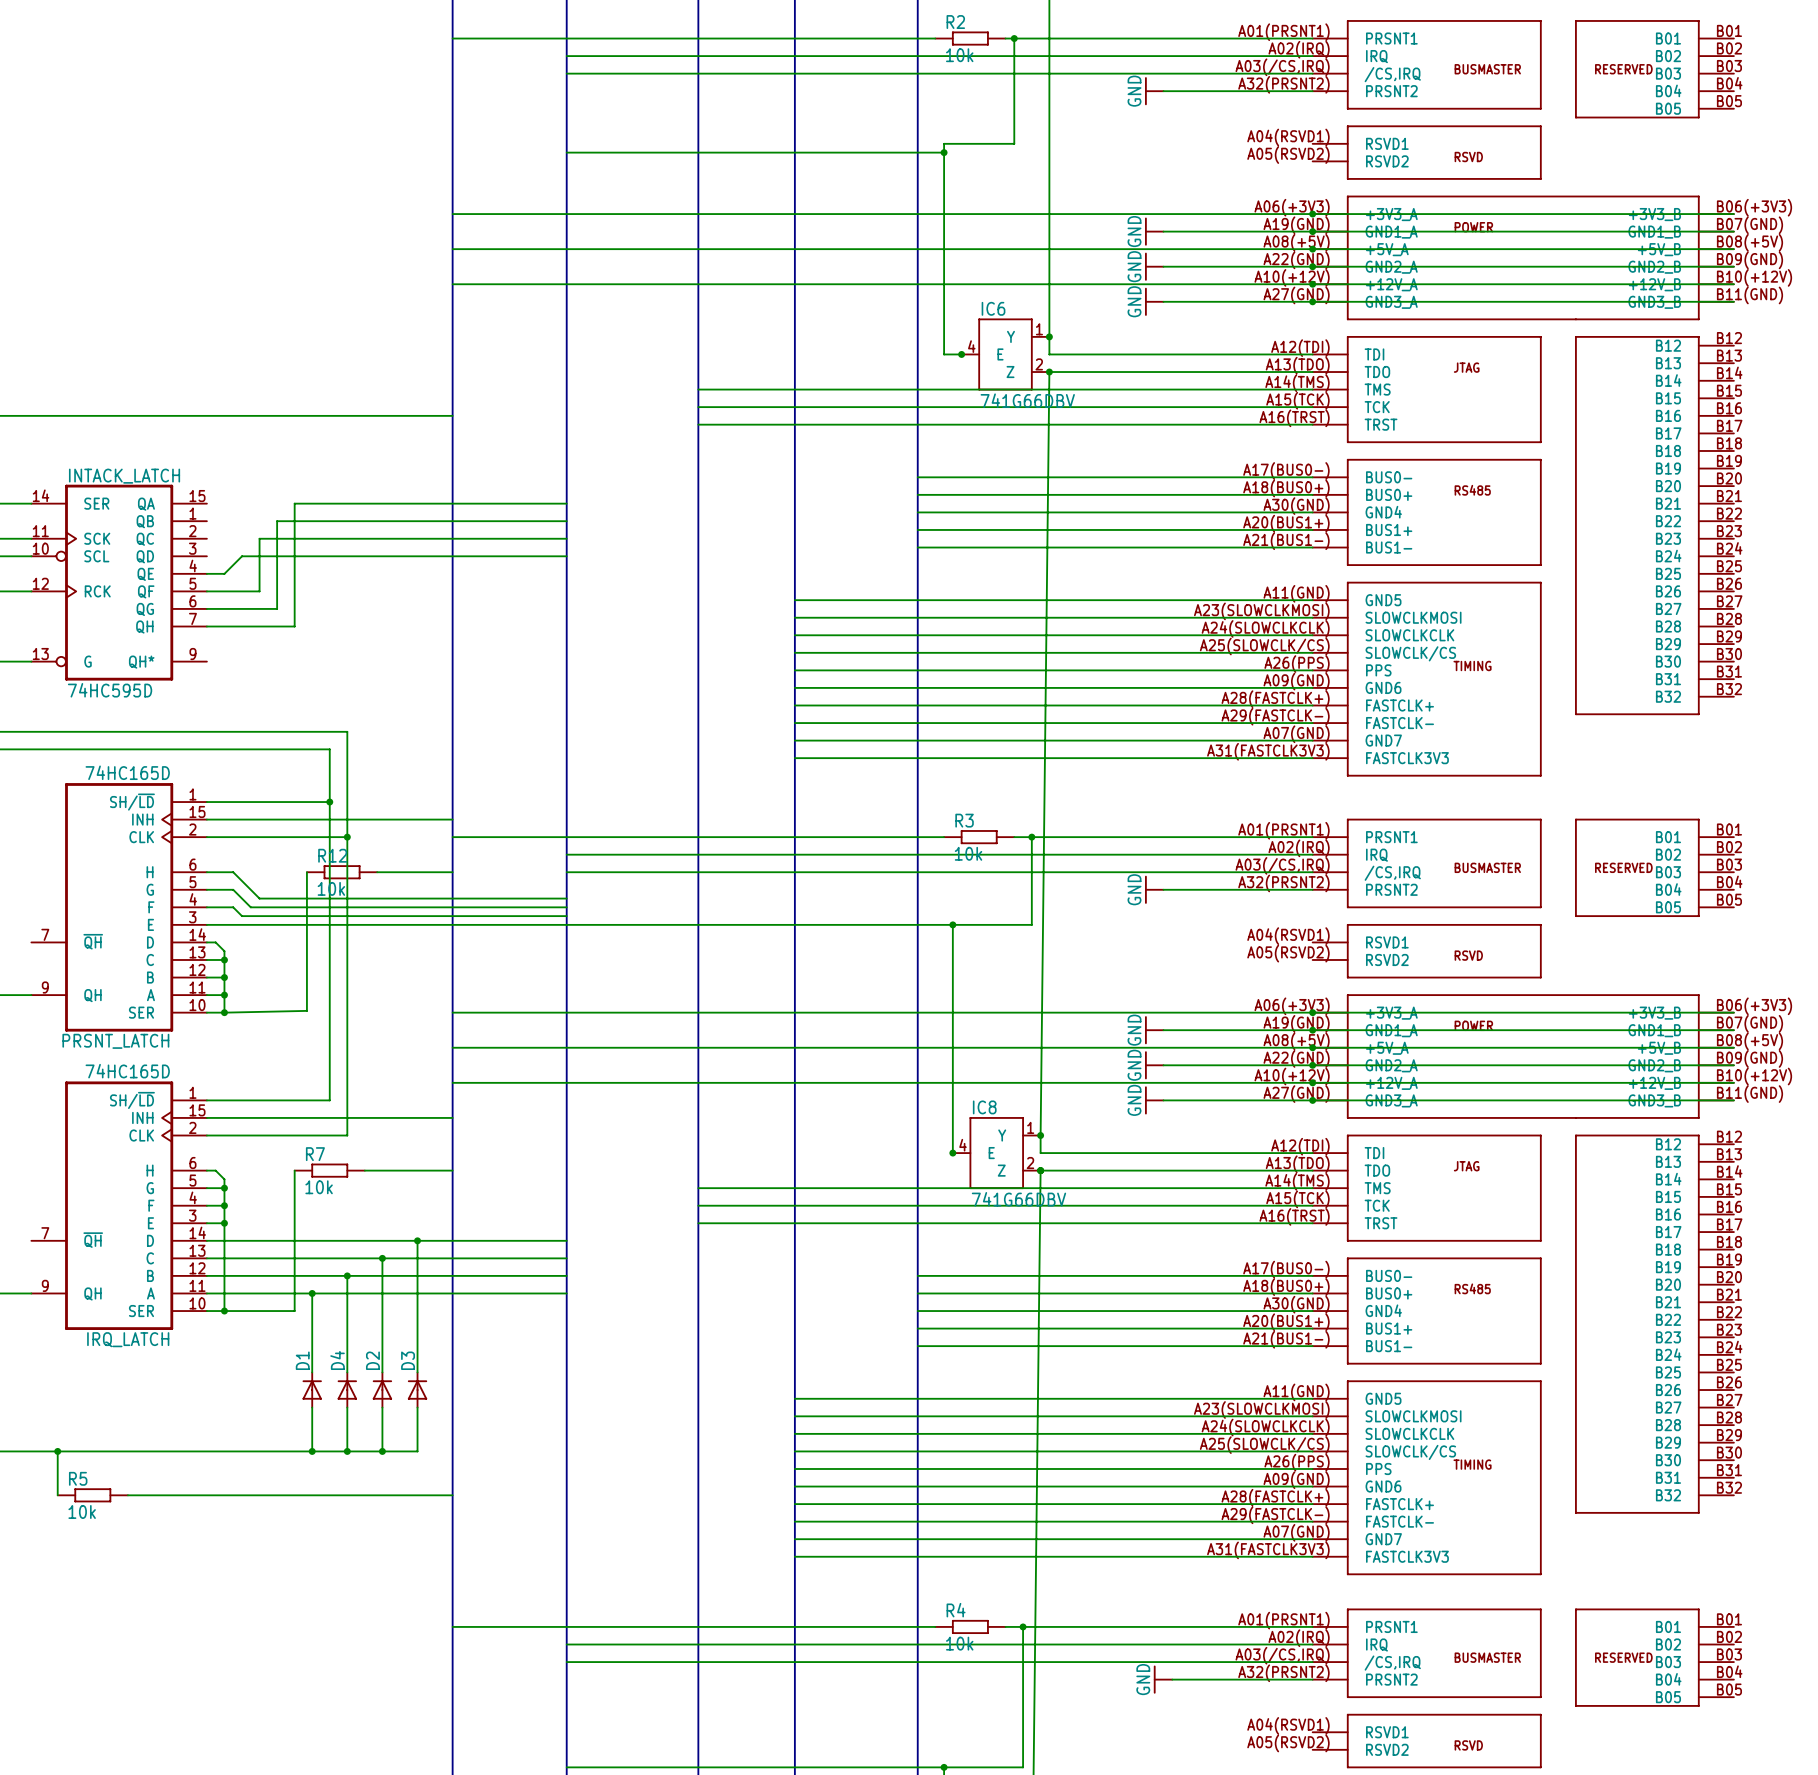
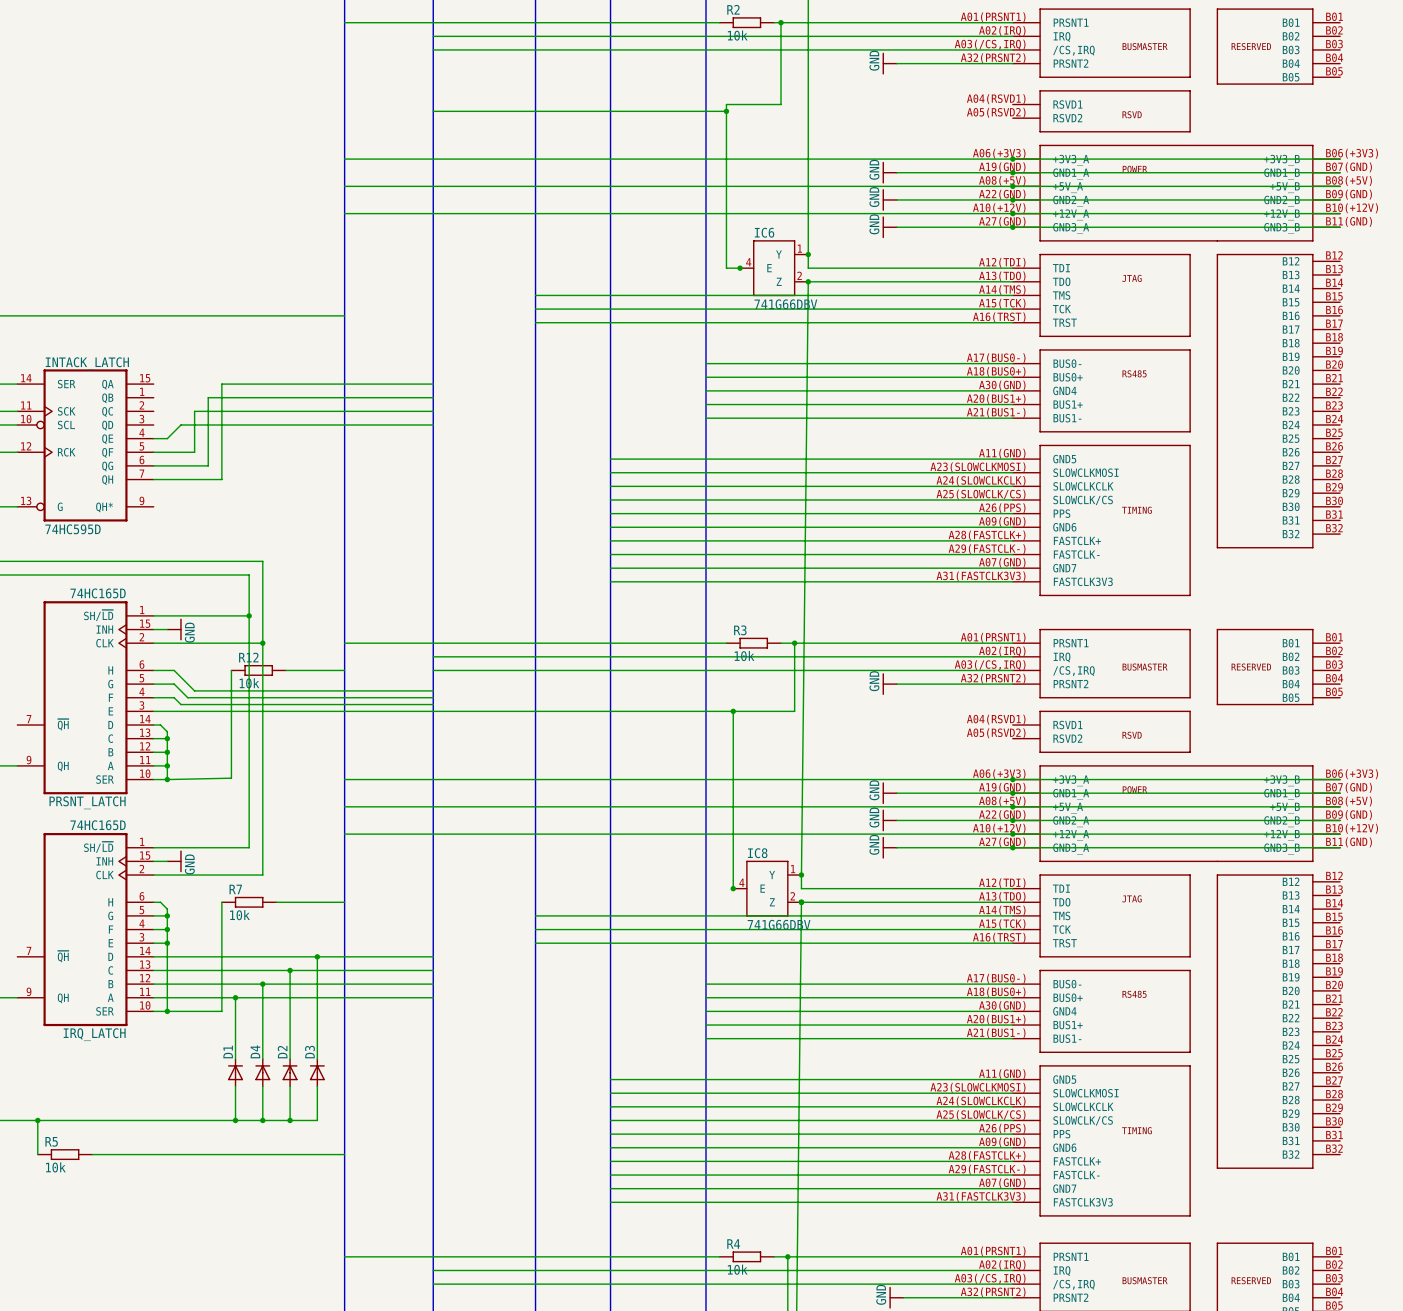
wire: (224, 819) (452, 819) -> none
power symbol: none -> GND (174, 629)
wire: (224, 1117) (452, 1117) -> none
power symbol: none -> GND (174, 861)

